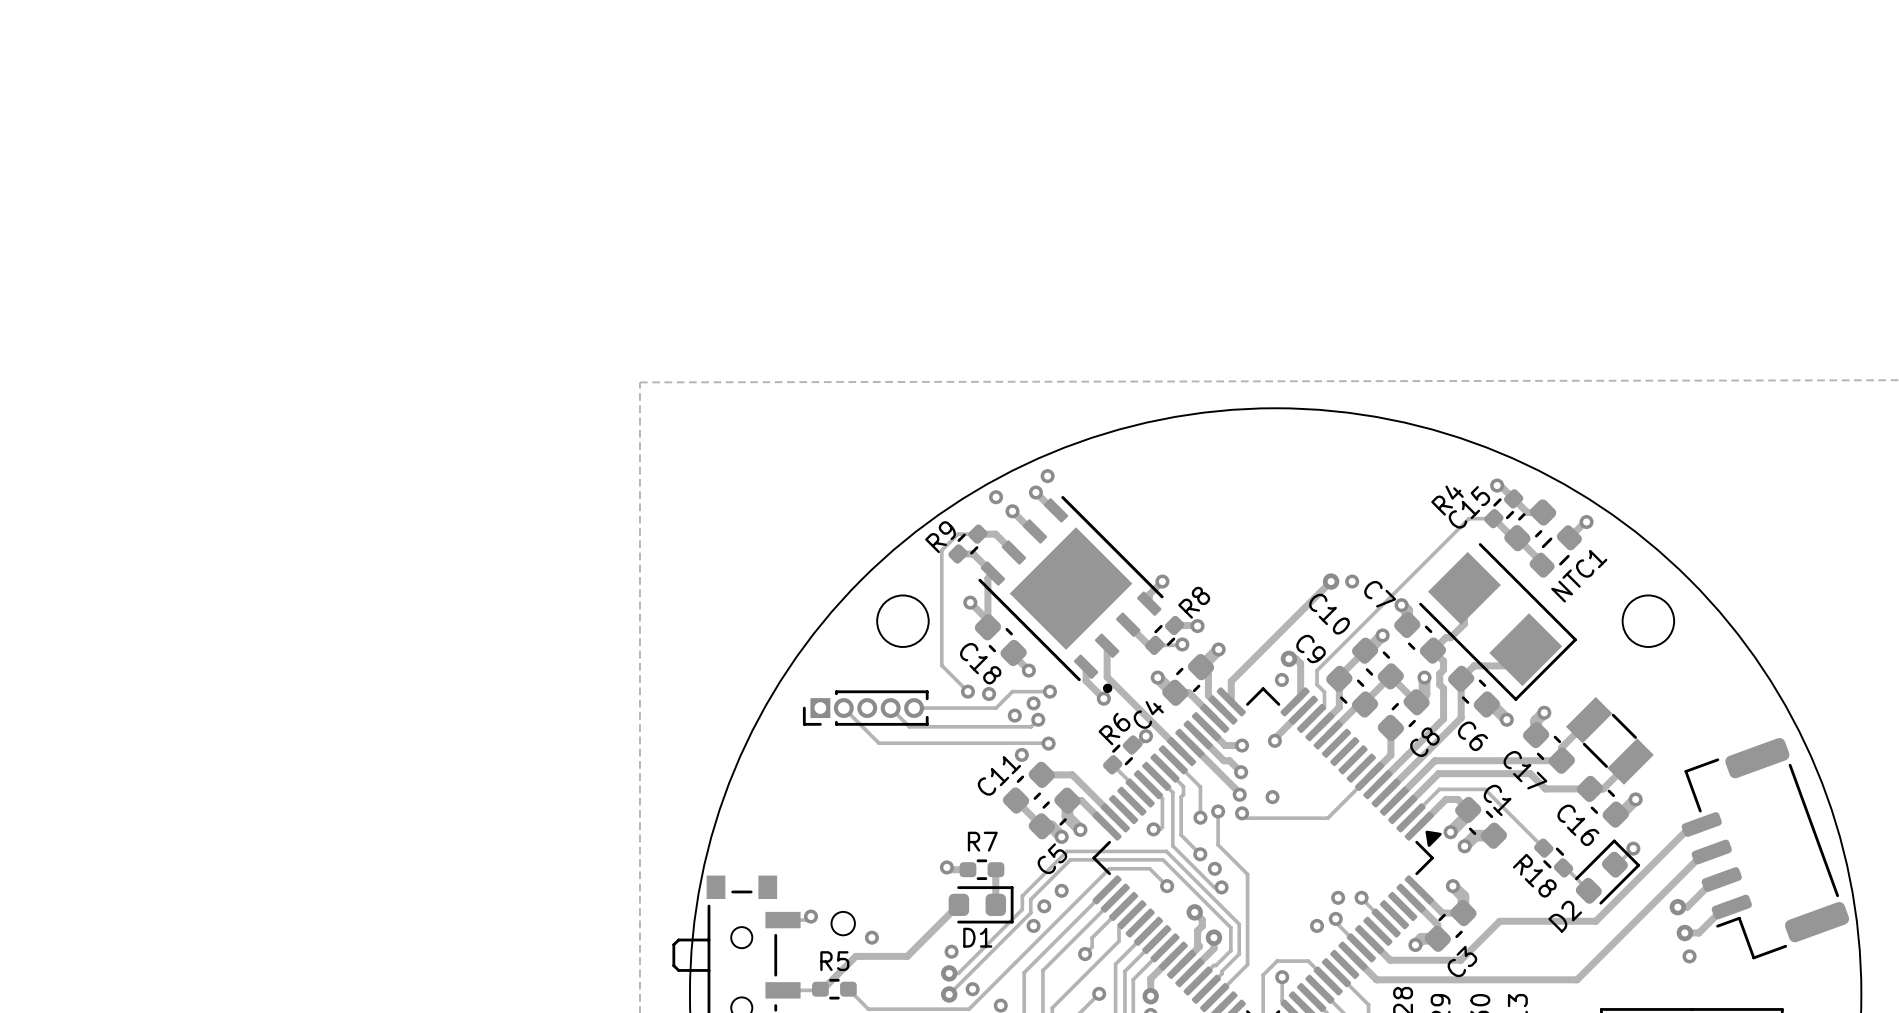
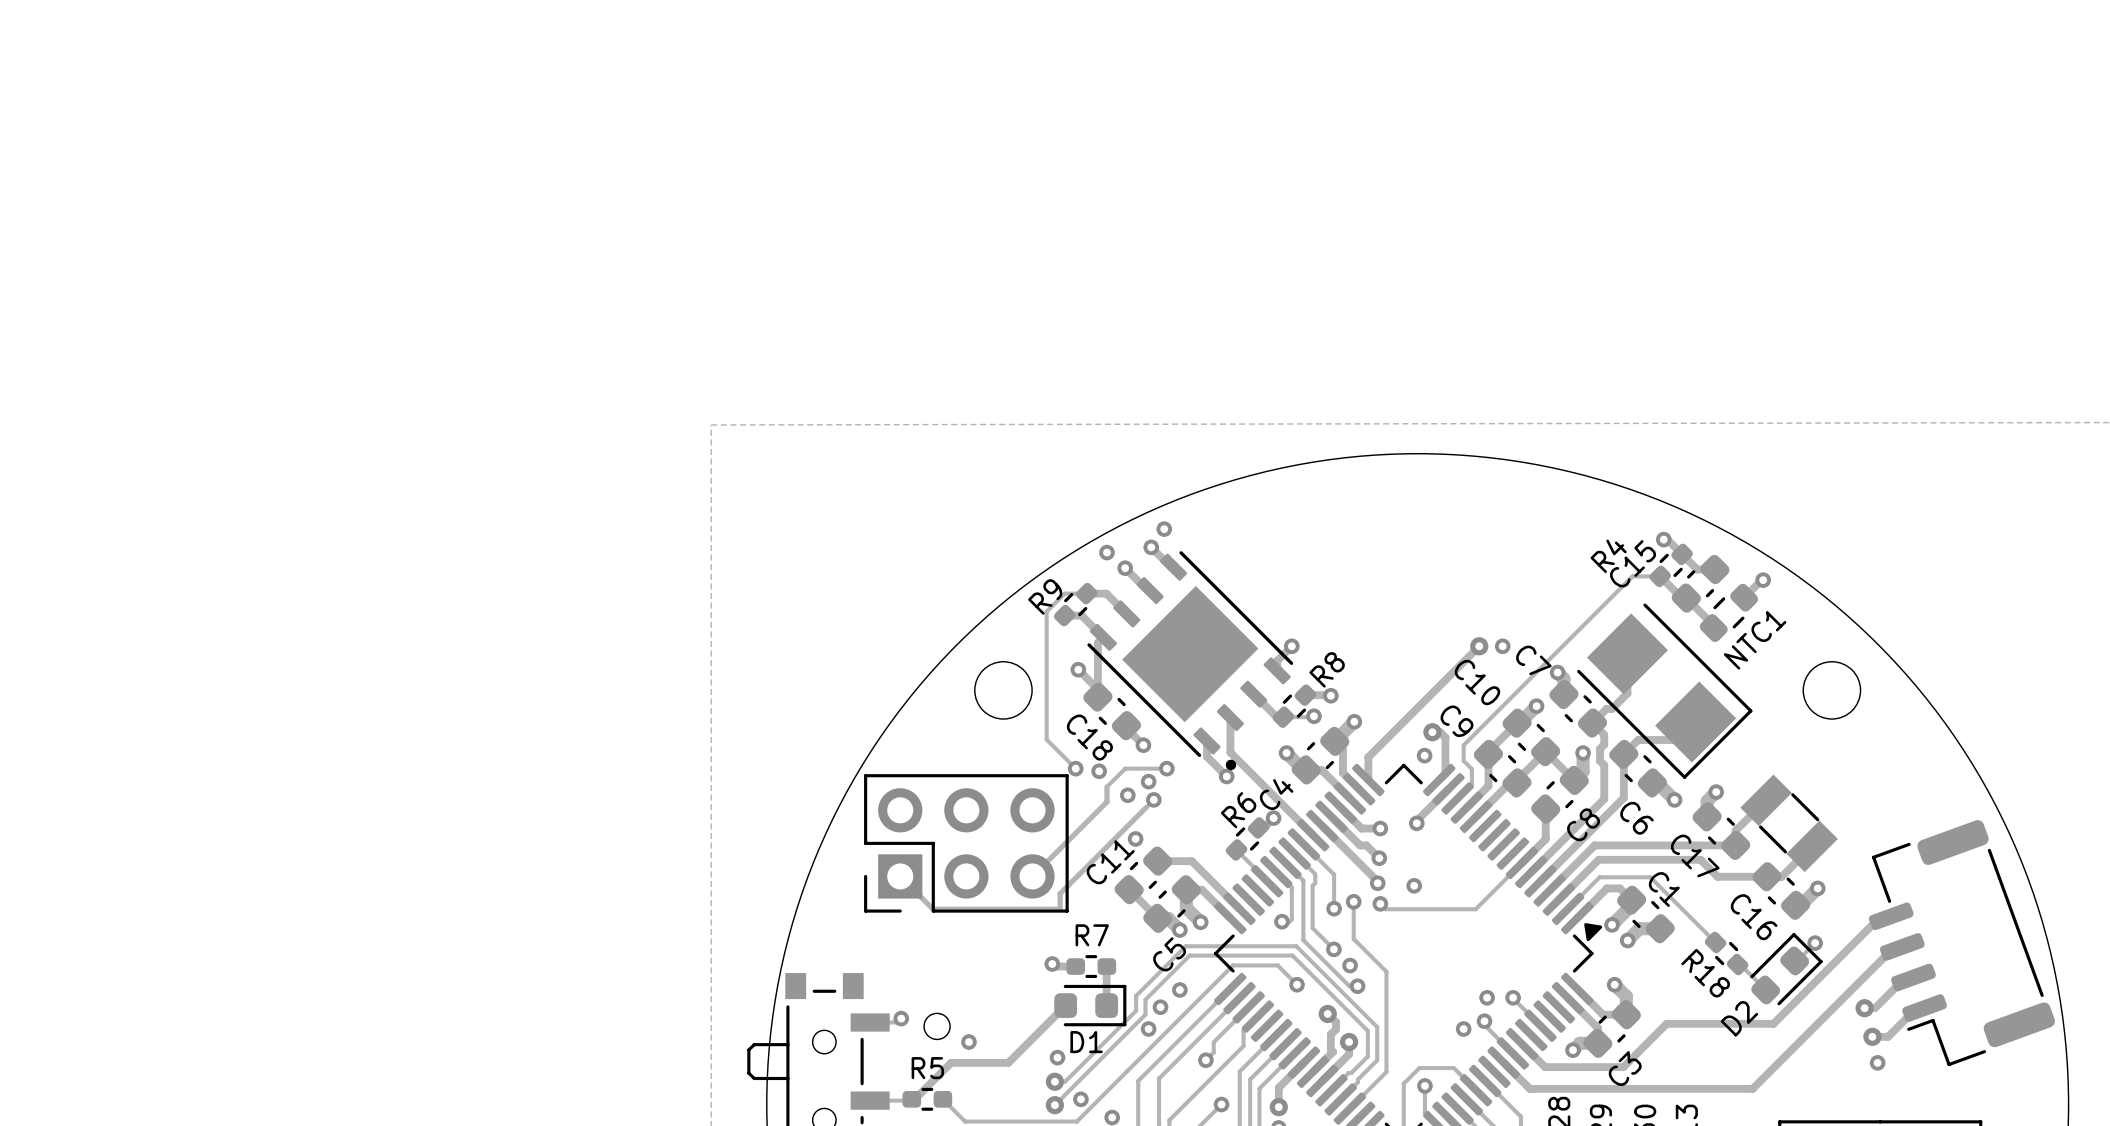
track: (843, 708) (878, 743) (1048, 743) -> none
part: (865, 708) -> none
track: (890, 708) (909, 726) (1031, 726) -> (900, 876) (933, 909) (1060, 909) (1060, 893) (1146, 807)
track: (914, 708) (996, 708) -> (1032, 876) (1106, 801) (1106, 786)
via: (1048, 743) -> none
part: none -> (966, 843)

